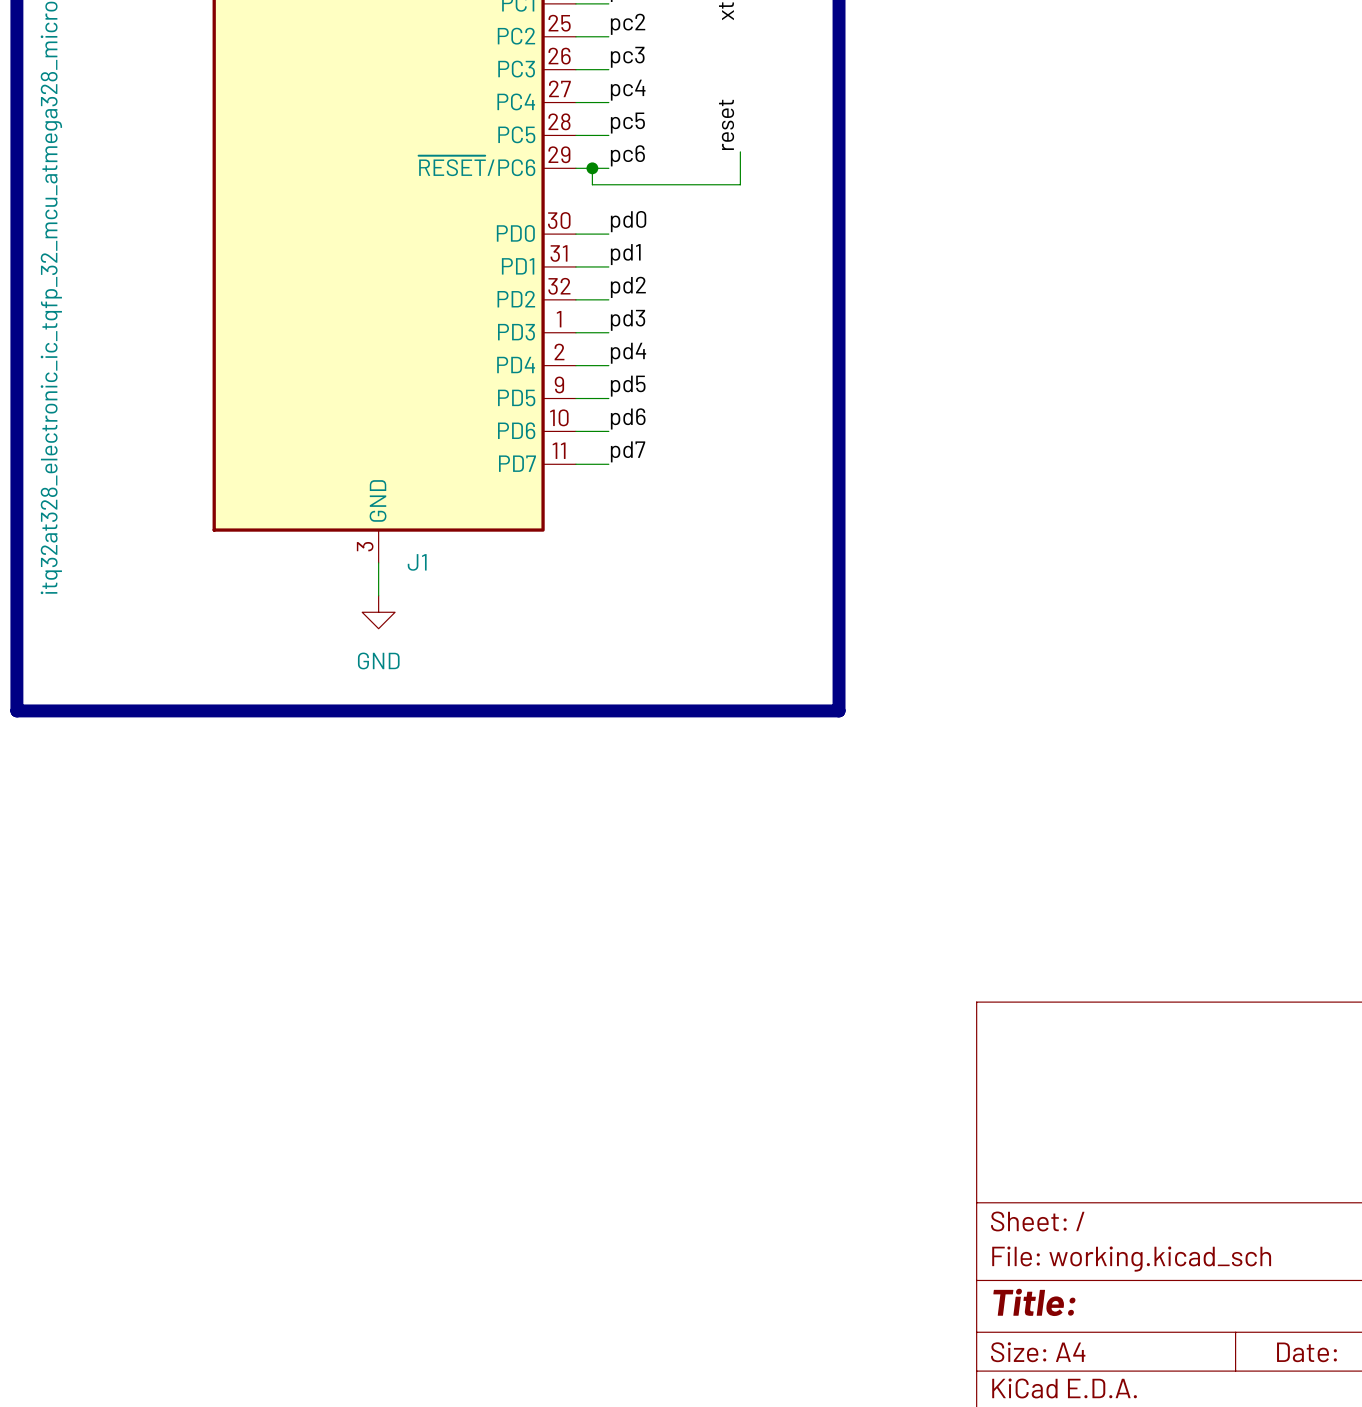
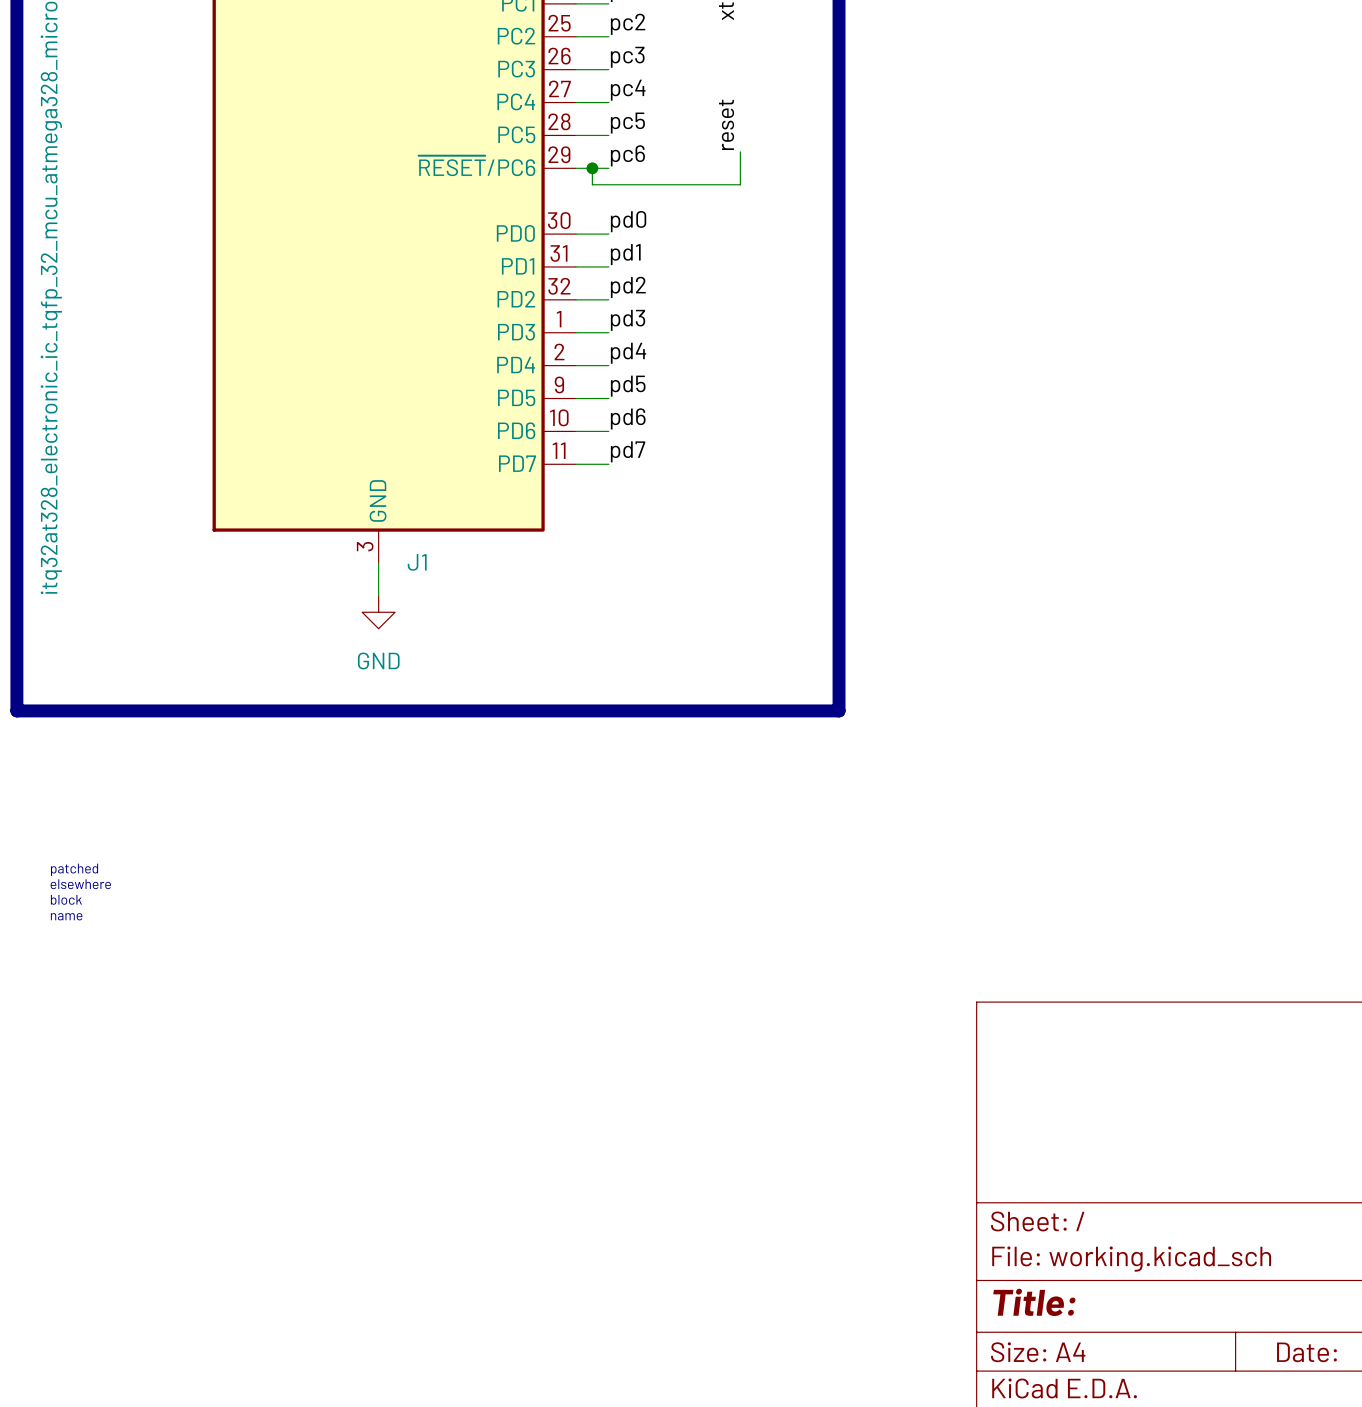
text: none -> patched (74, 869)
text: none -> elsewhere (80, 884)
text: none -> block (66, 899)
text: none -> name (66, 916)

